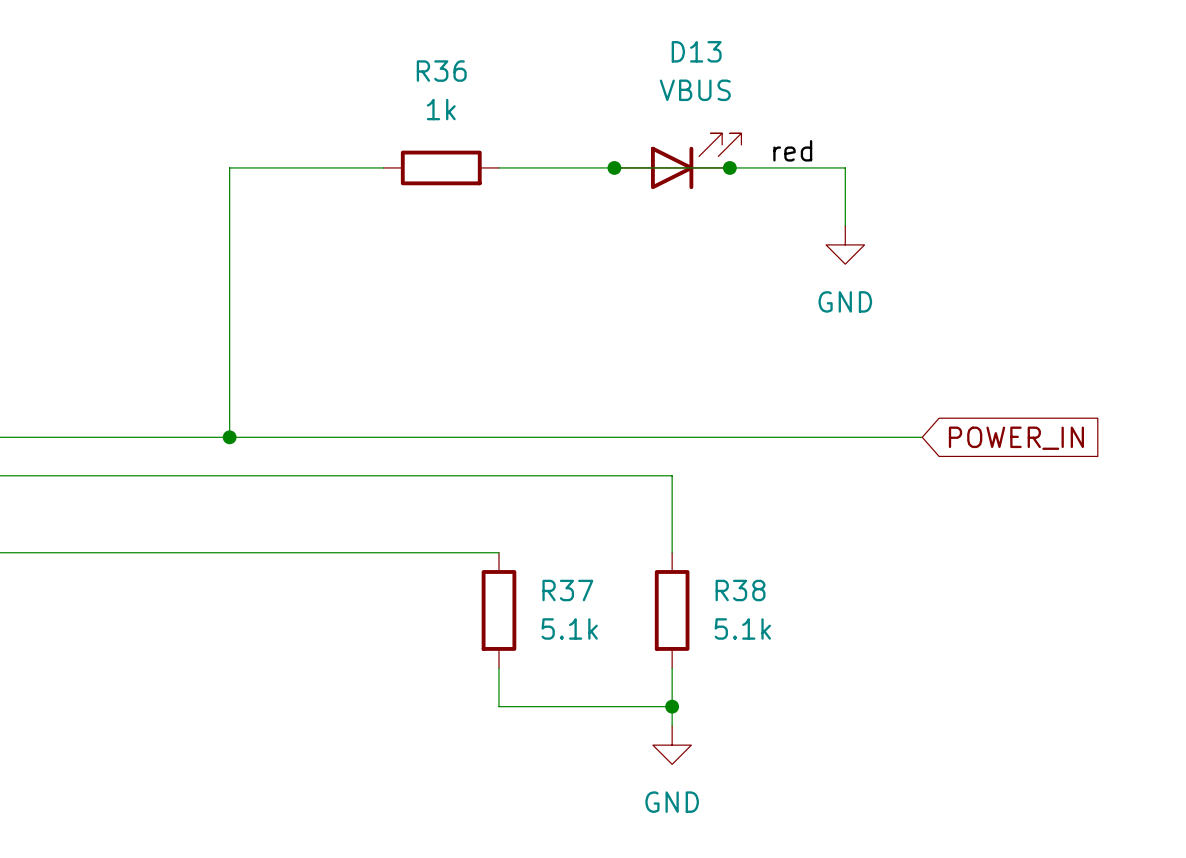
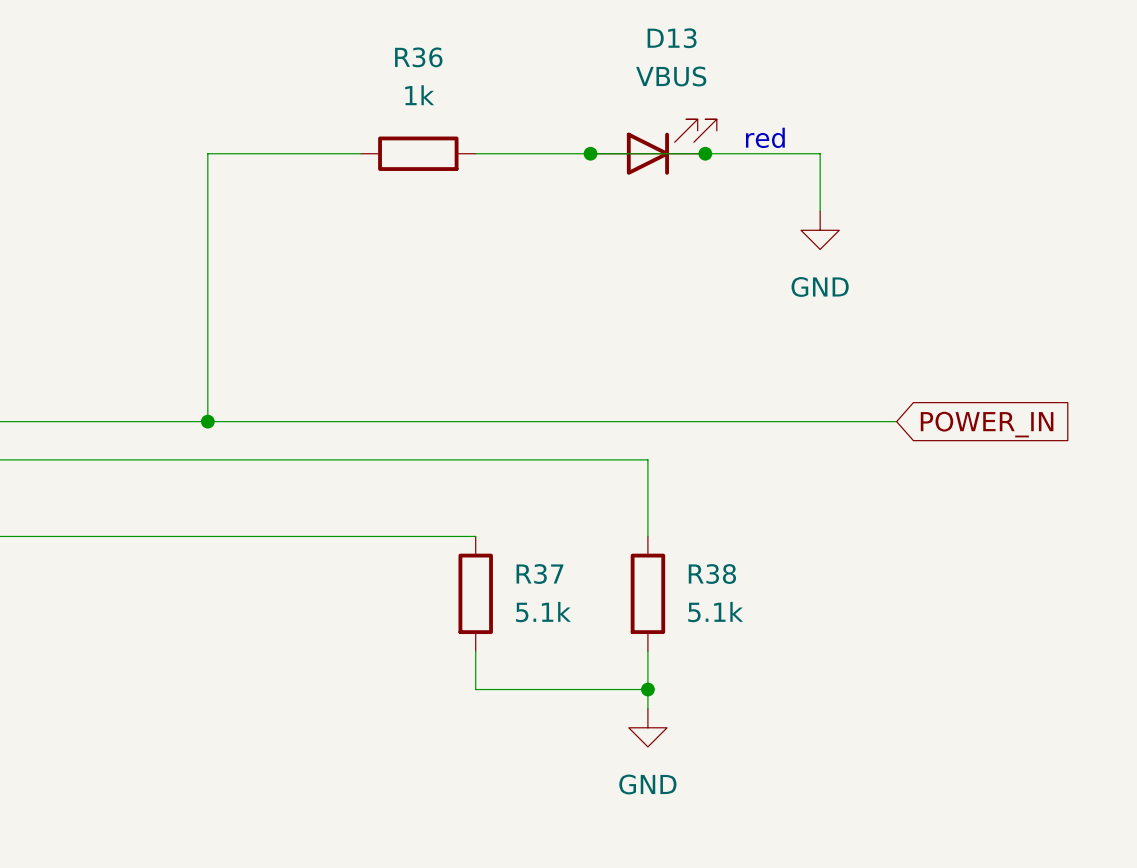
label: red (792, 150) -> none
text: none -> red (765, 137)

